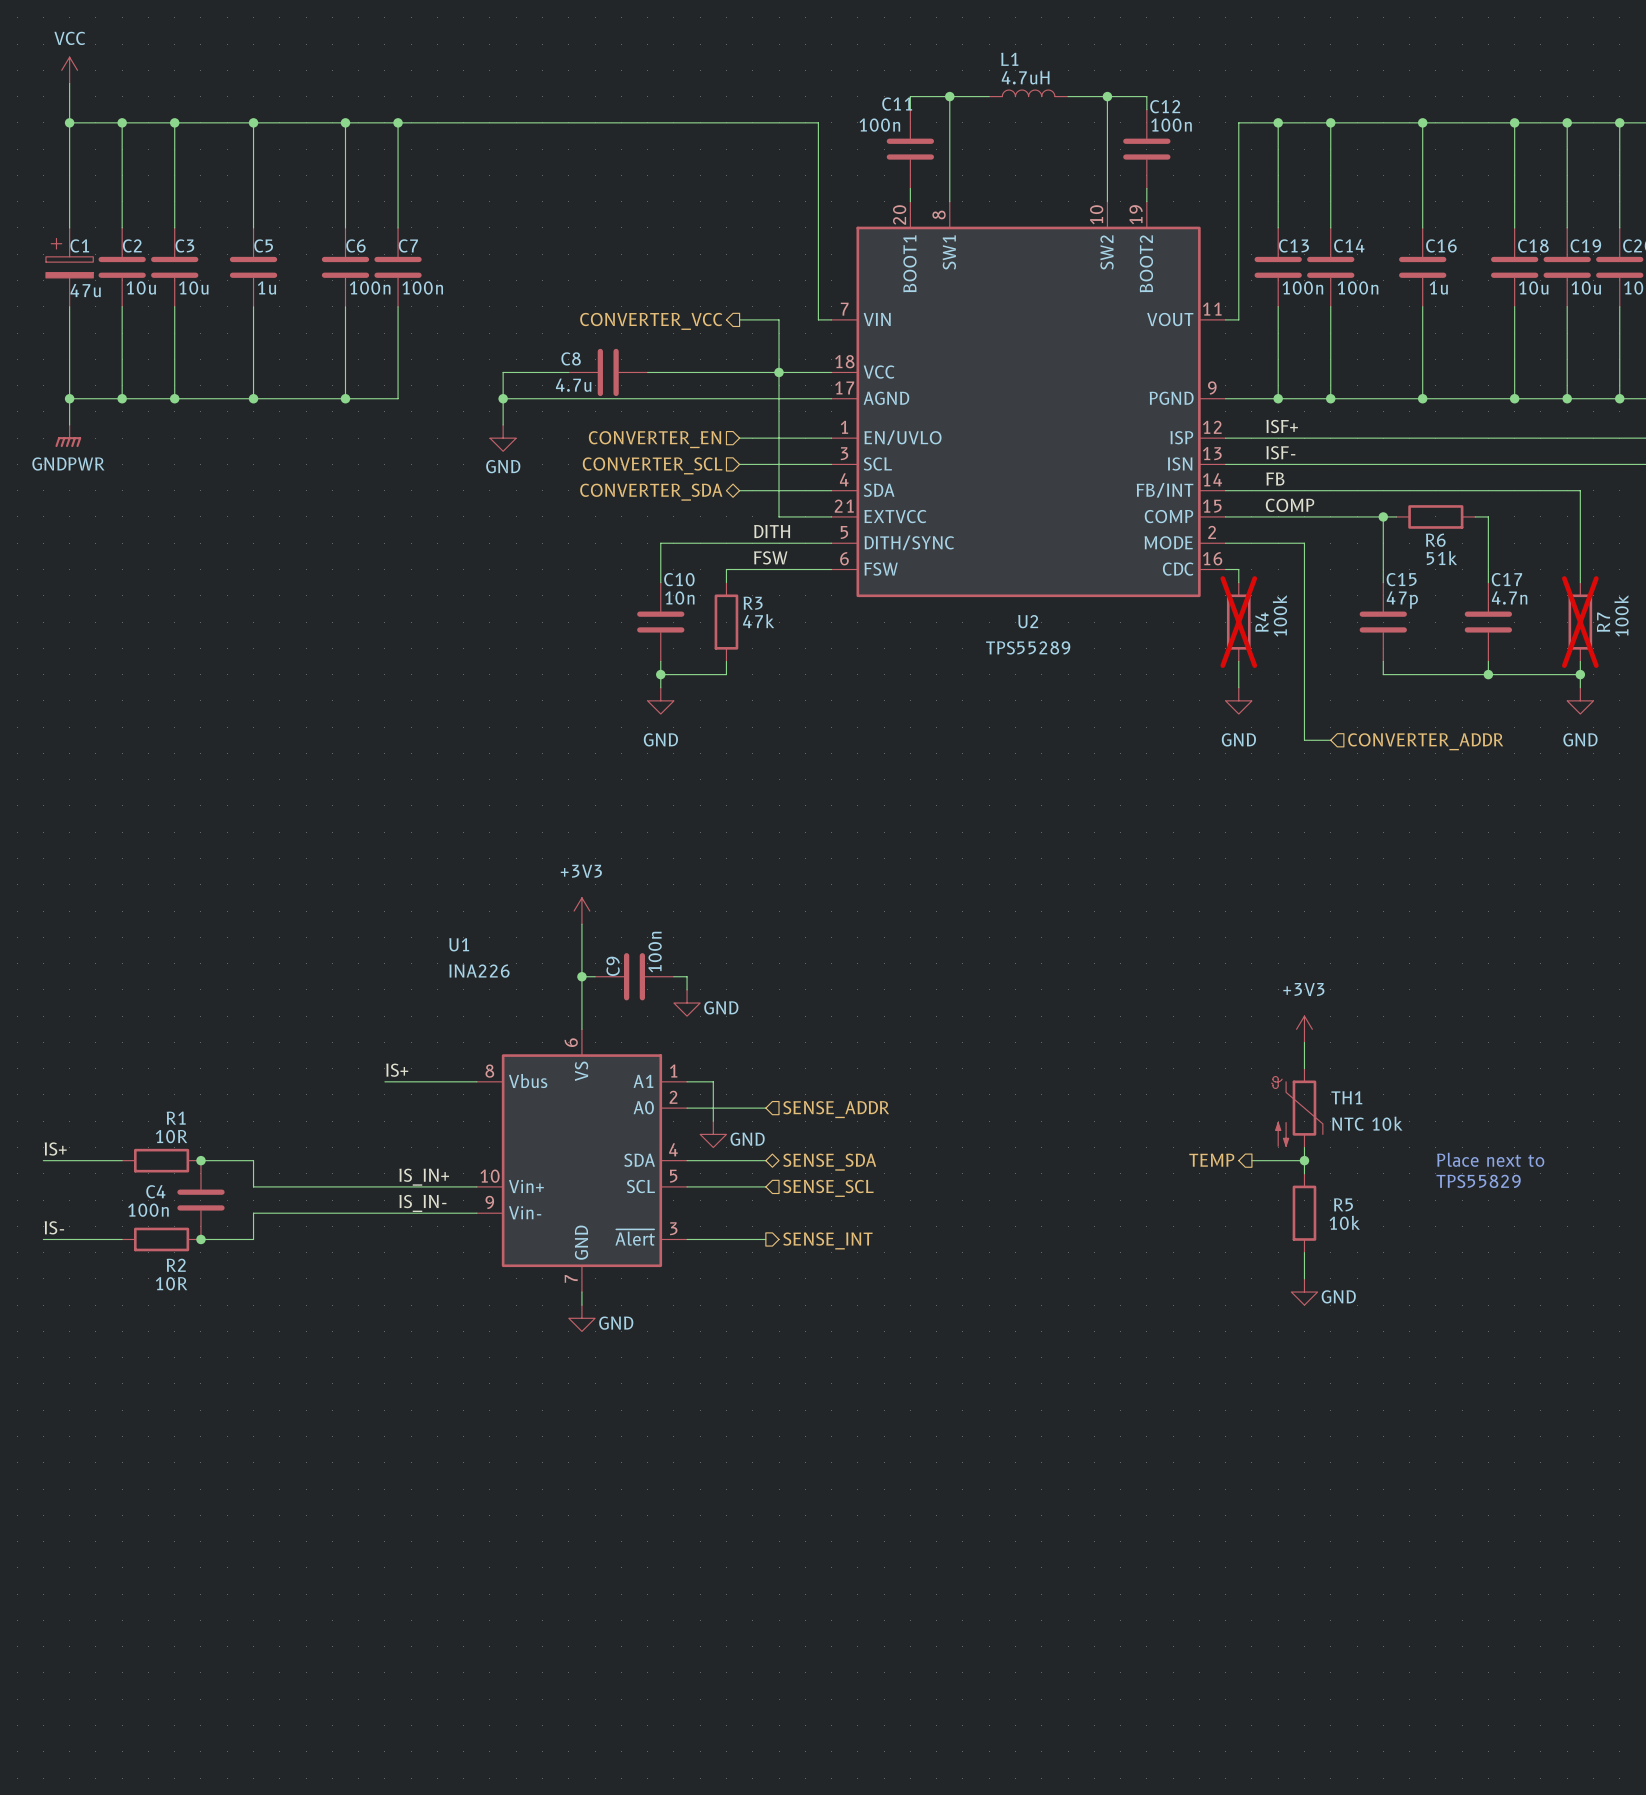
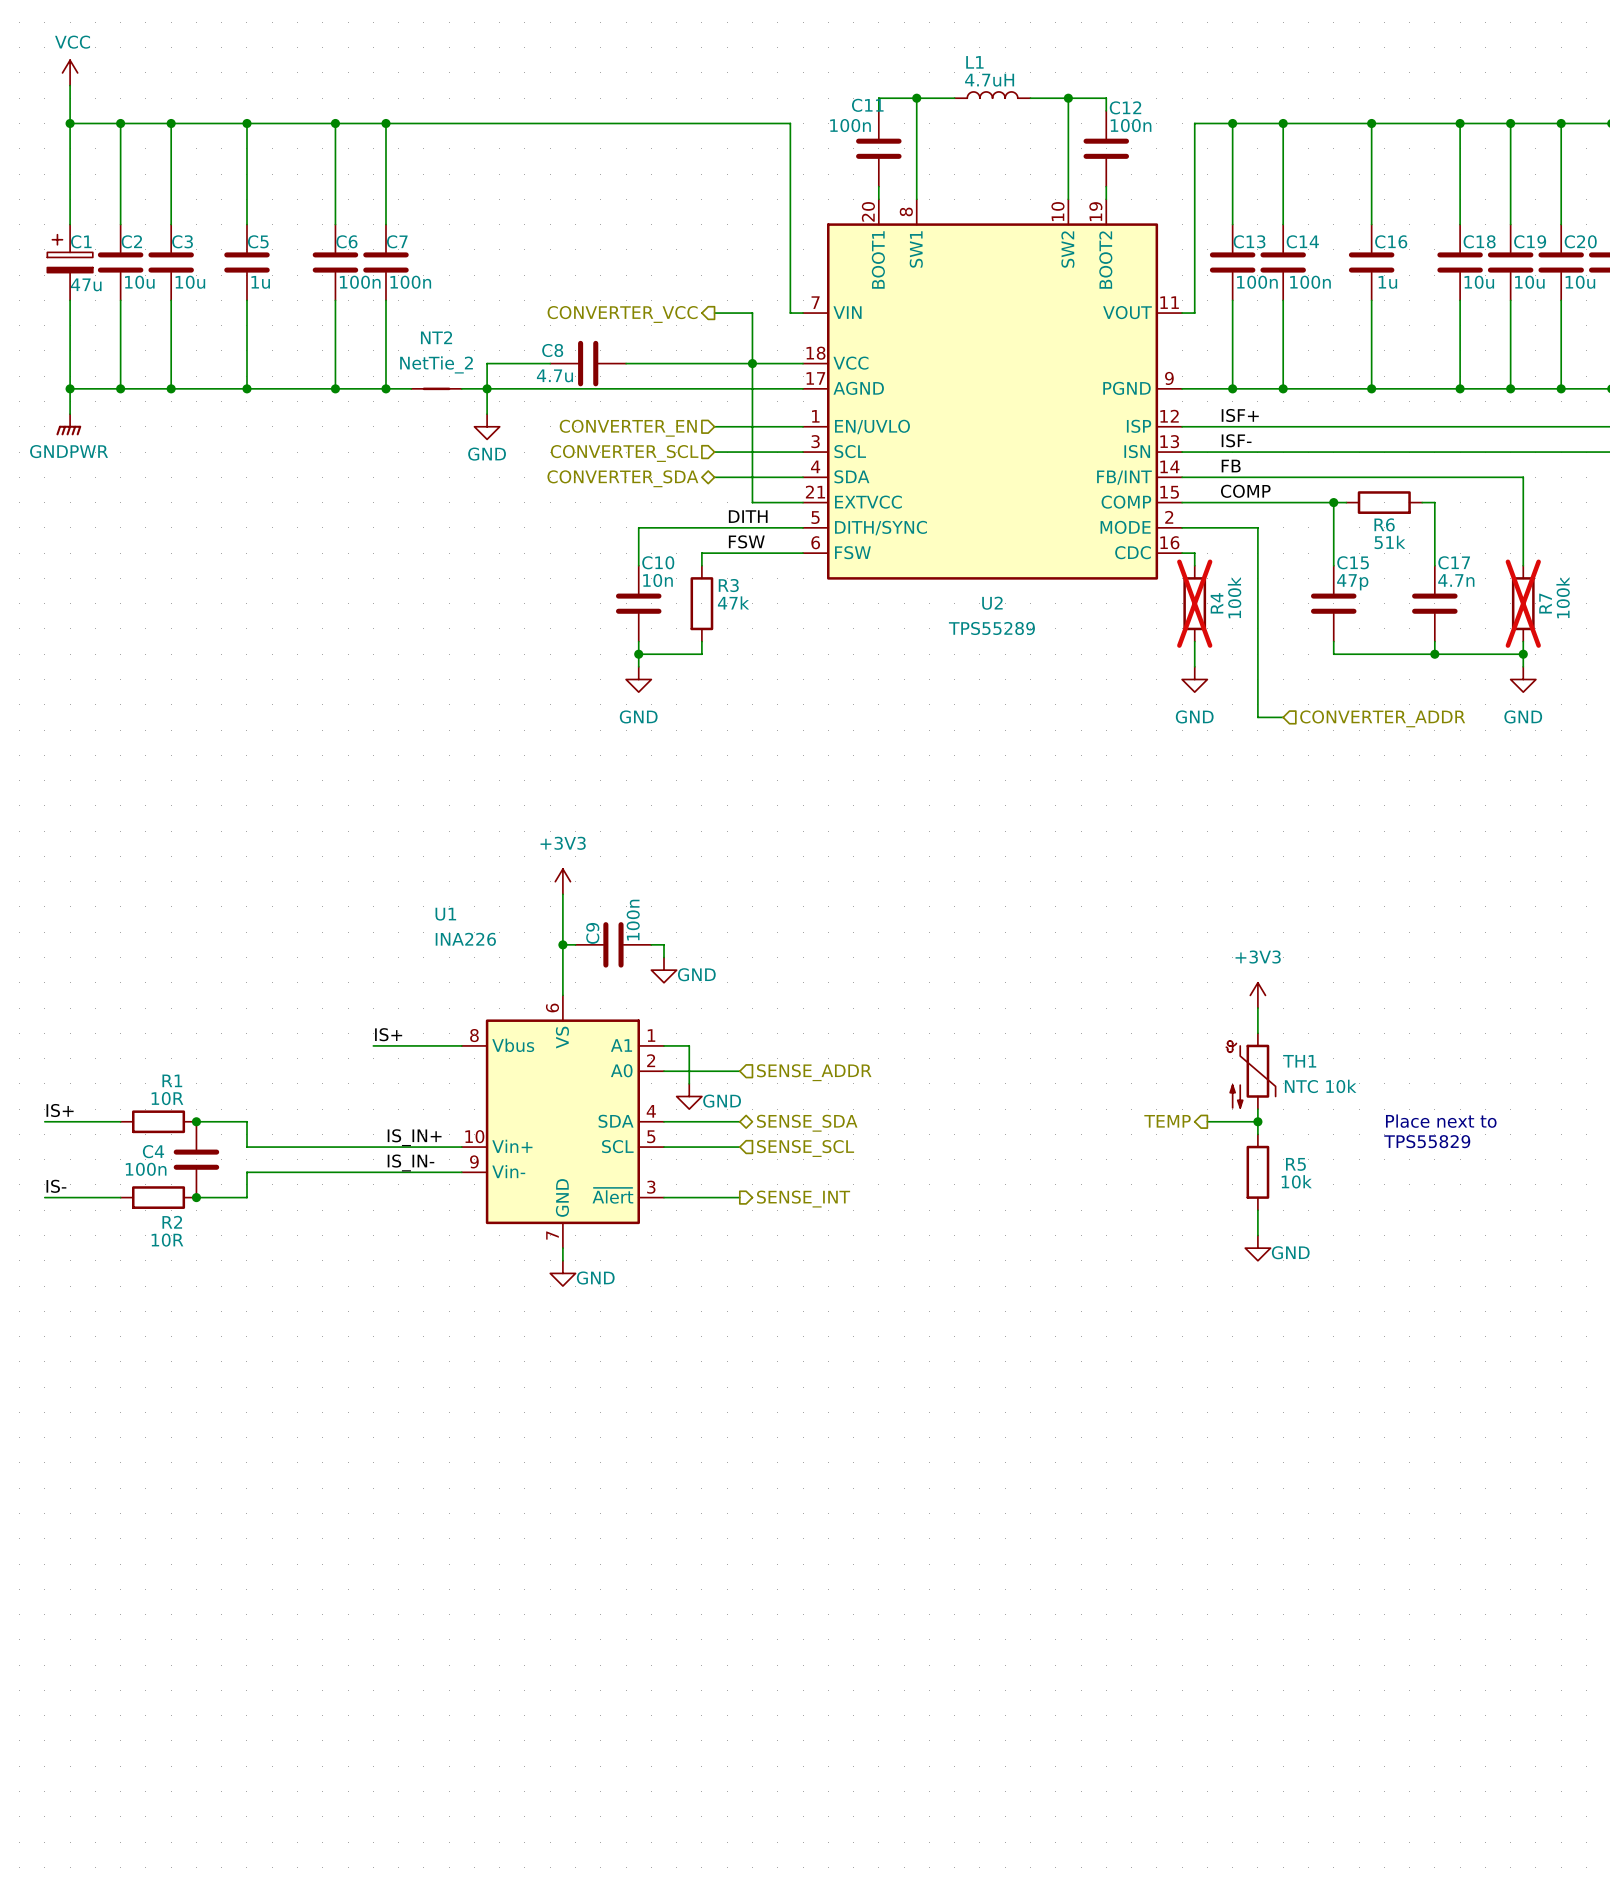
wire: none -> (385, 388) (411, 388)
junction: none -> (385, 388)
NT2: none -> NetTie_2 (436, 388)
wire: none -> (461, 388) (487, 388)

